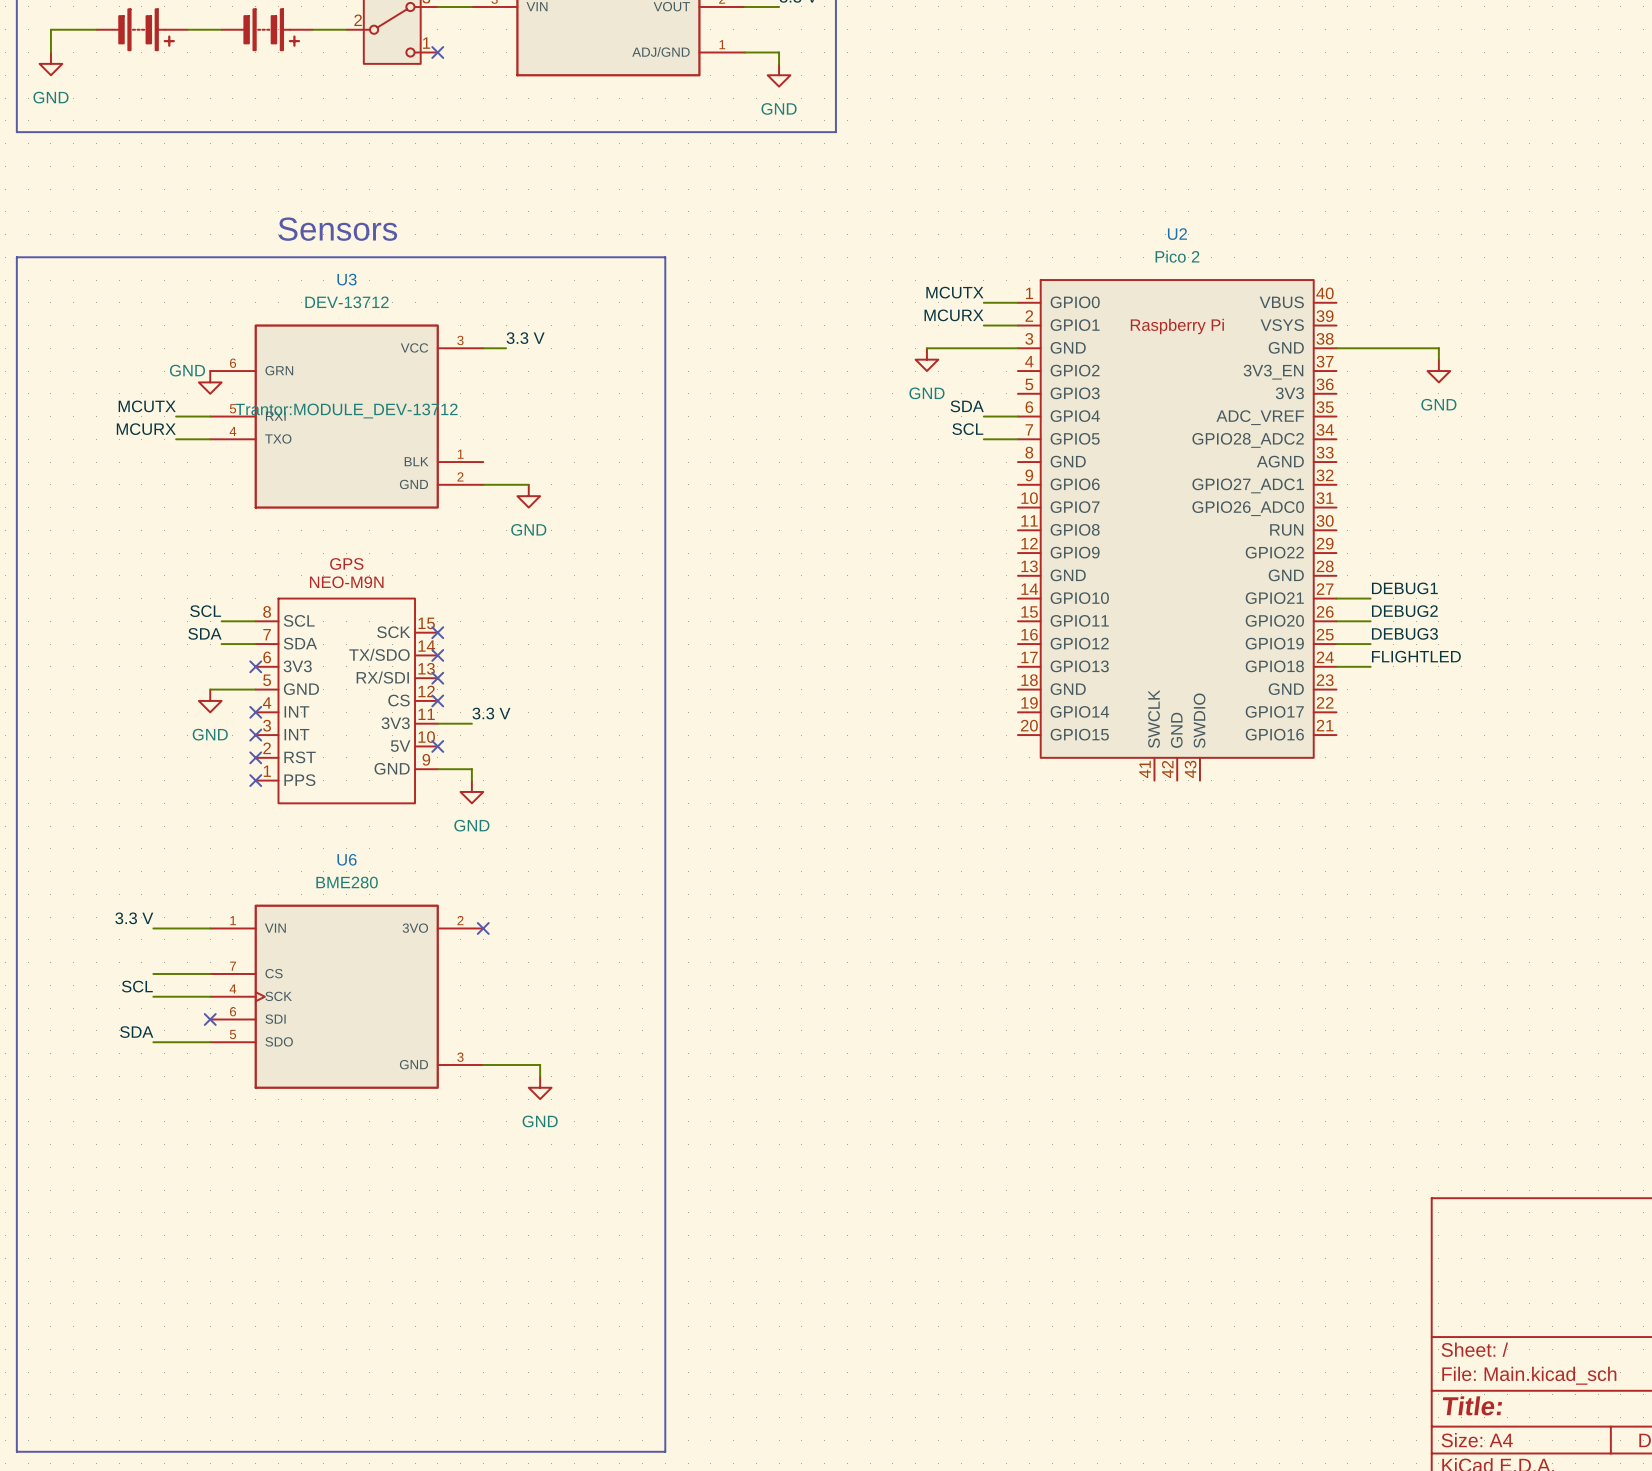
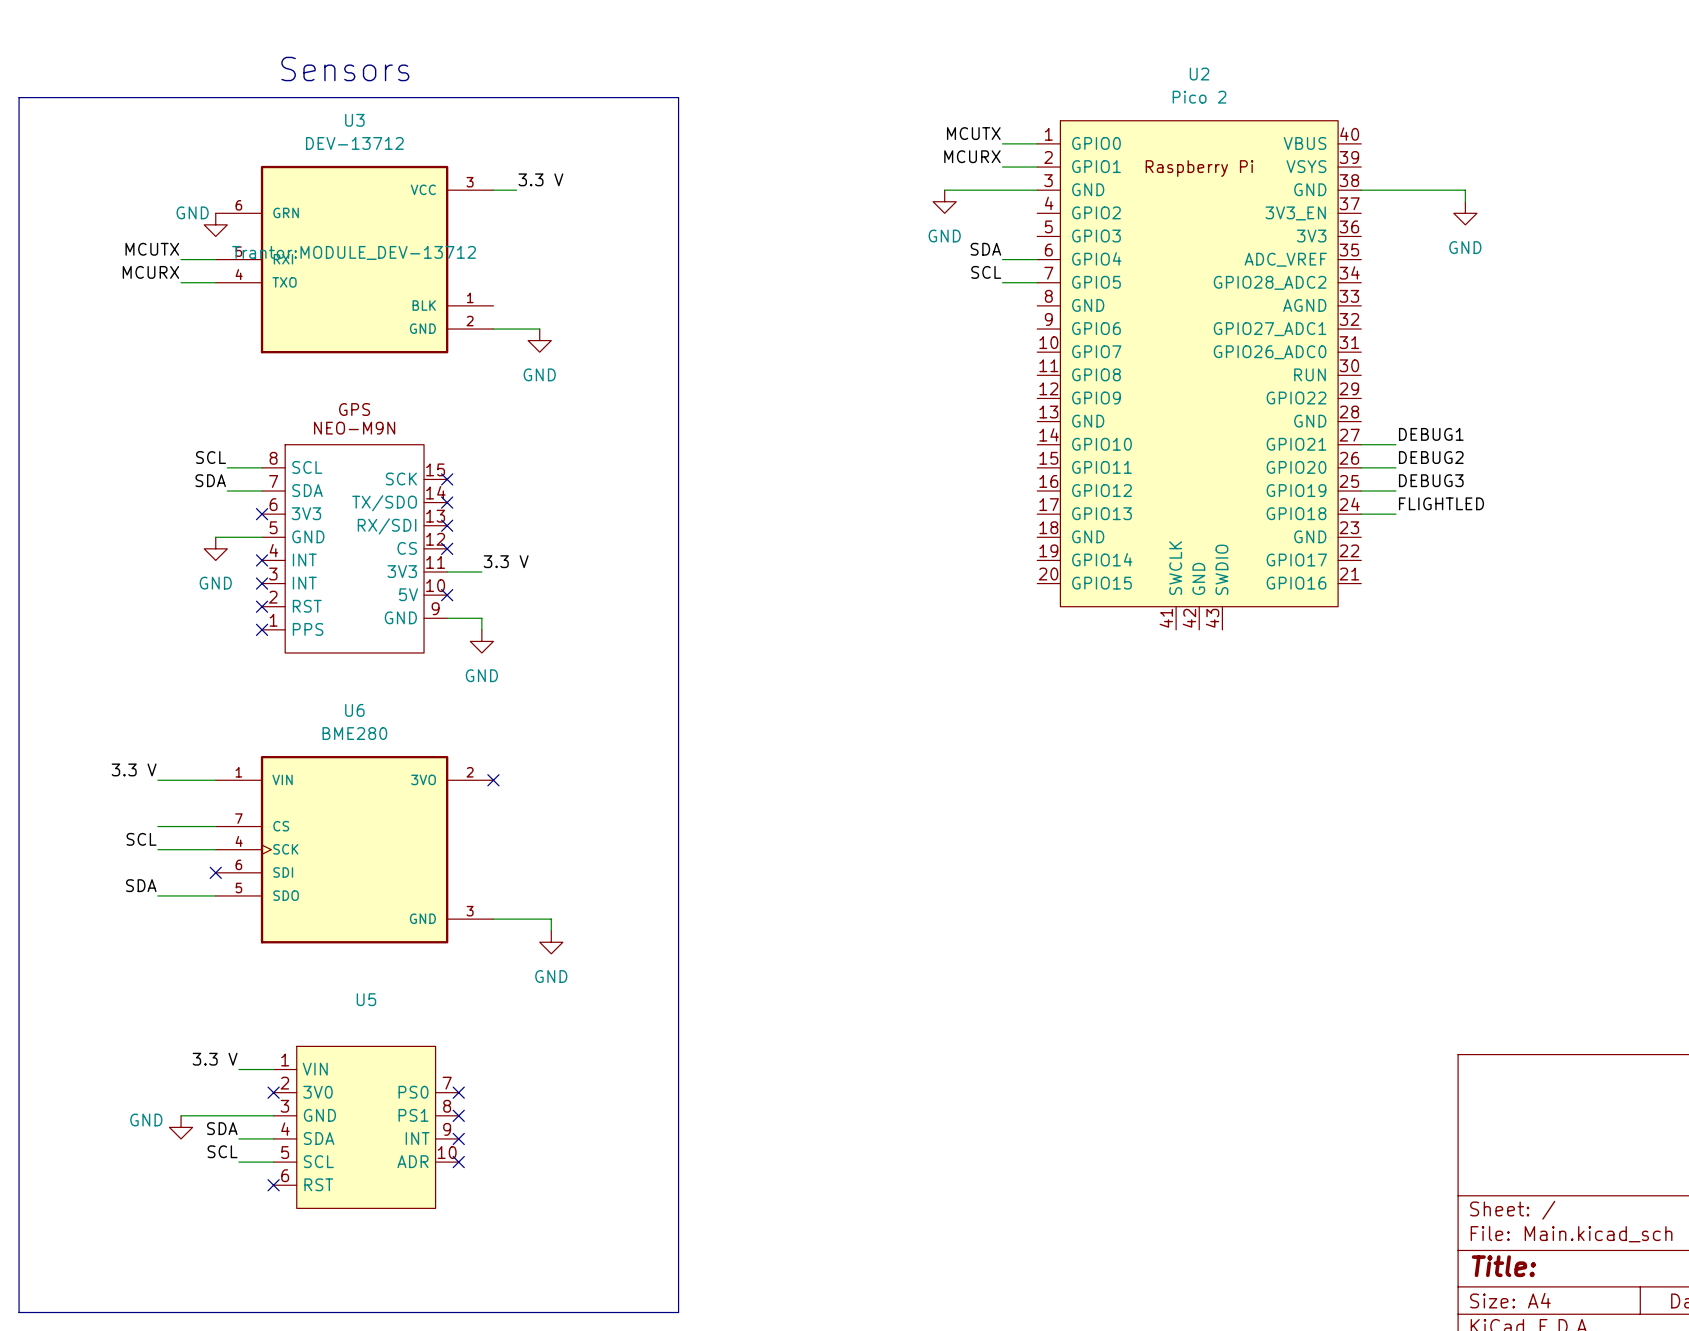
label: none -> 3.3 V (215, 1059)
wire: none -> (238, 1069) (273, 1069)
no-connect mark: none -> (273, 1092)
no-connect mark: none -> (458, 1092)
wire: none -> (181, 1115) (273, 1115)
no-connect mark: none -> (458, 1115)
power symbol: none -> GND (181, 1127)
U5: none -> (366, 1127)
label: none -> SDA (222, 1128)
wire: none -> (238, 1138) (273, 1138)
no-connect mark: none -> (458, 1138)
label: none -> SCL (222, 1151)
wire: none -> (238, 1162) (273, 1162)
no-connect mark: none -> (458, 1162)
no-connect mark: none -> (273, 1185)

